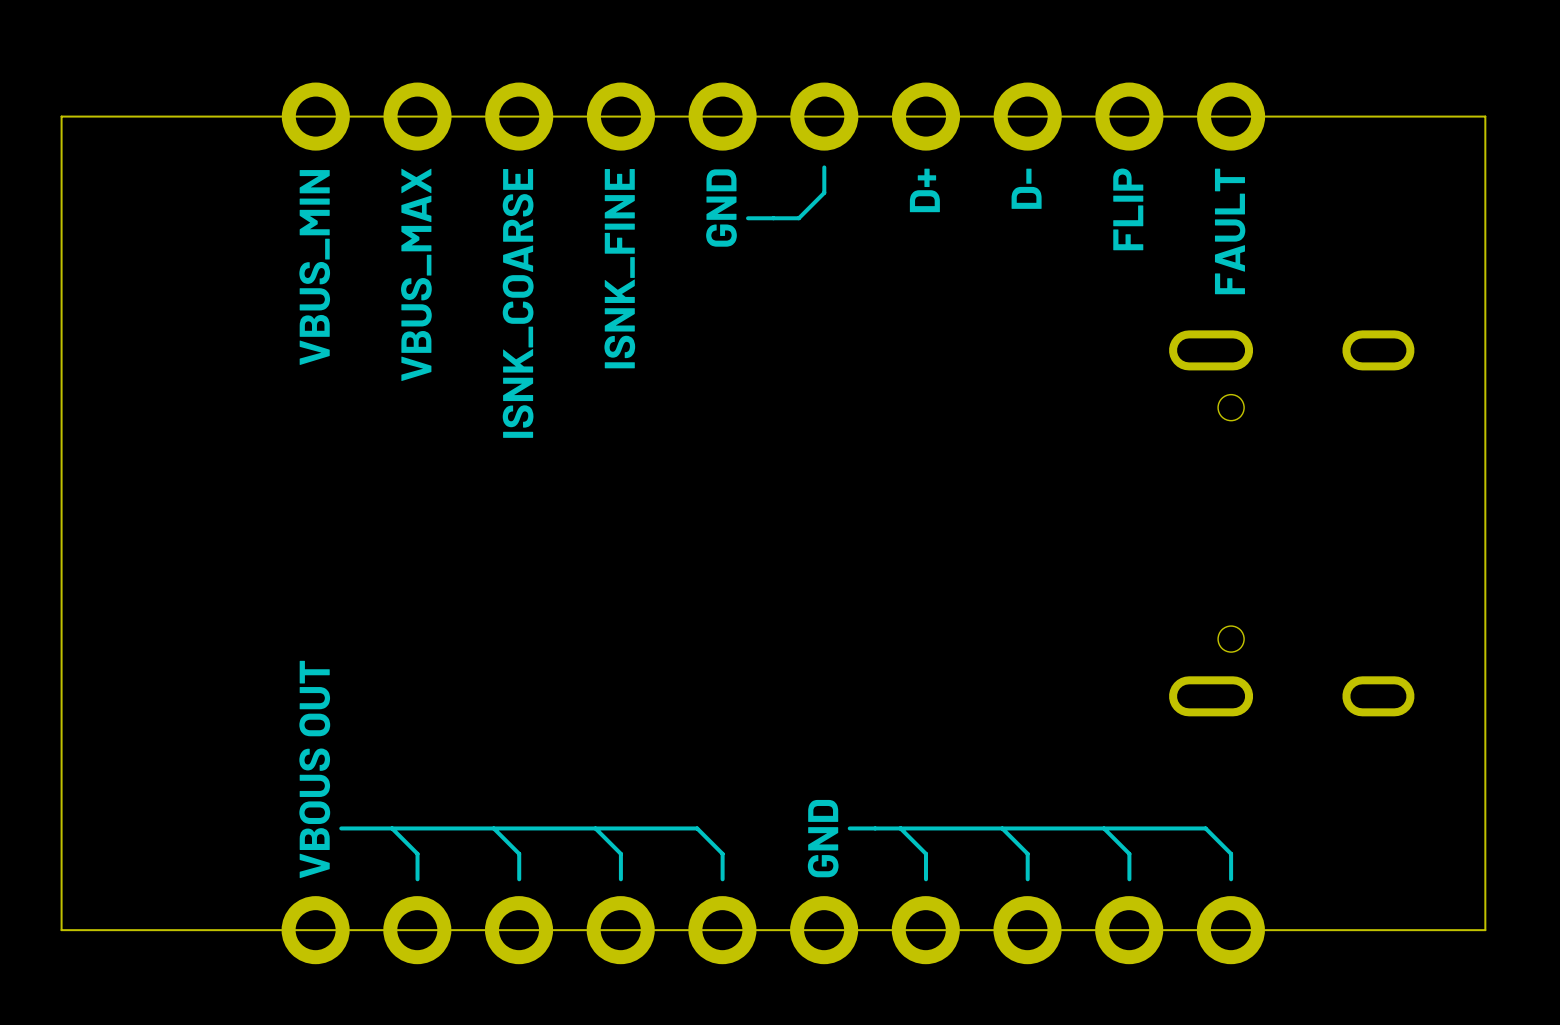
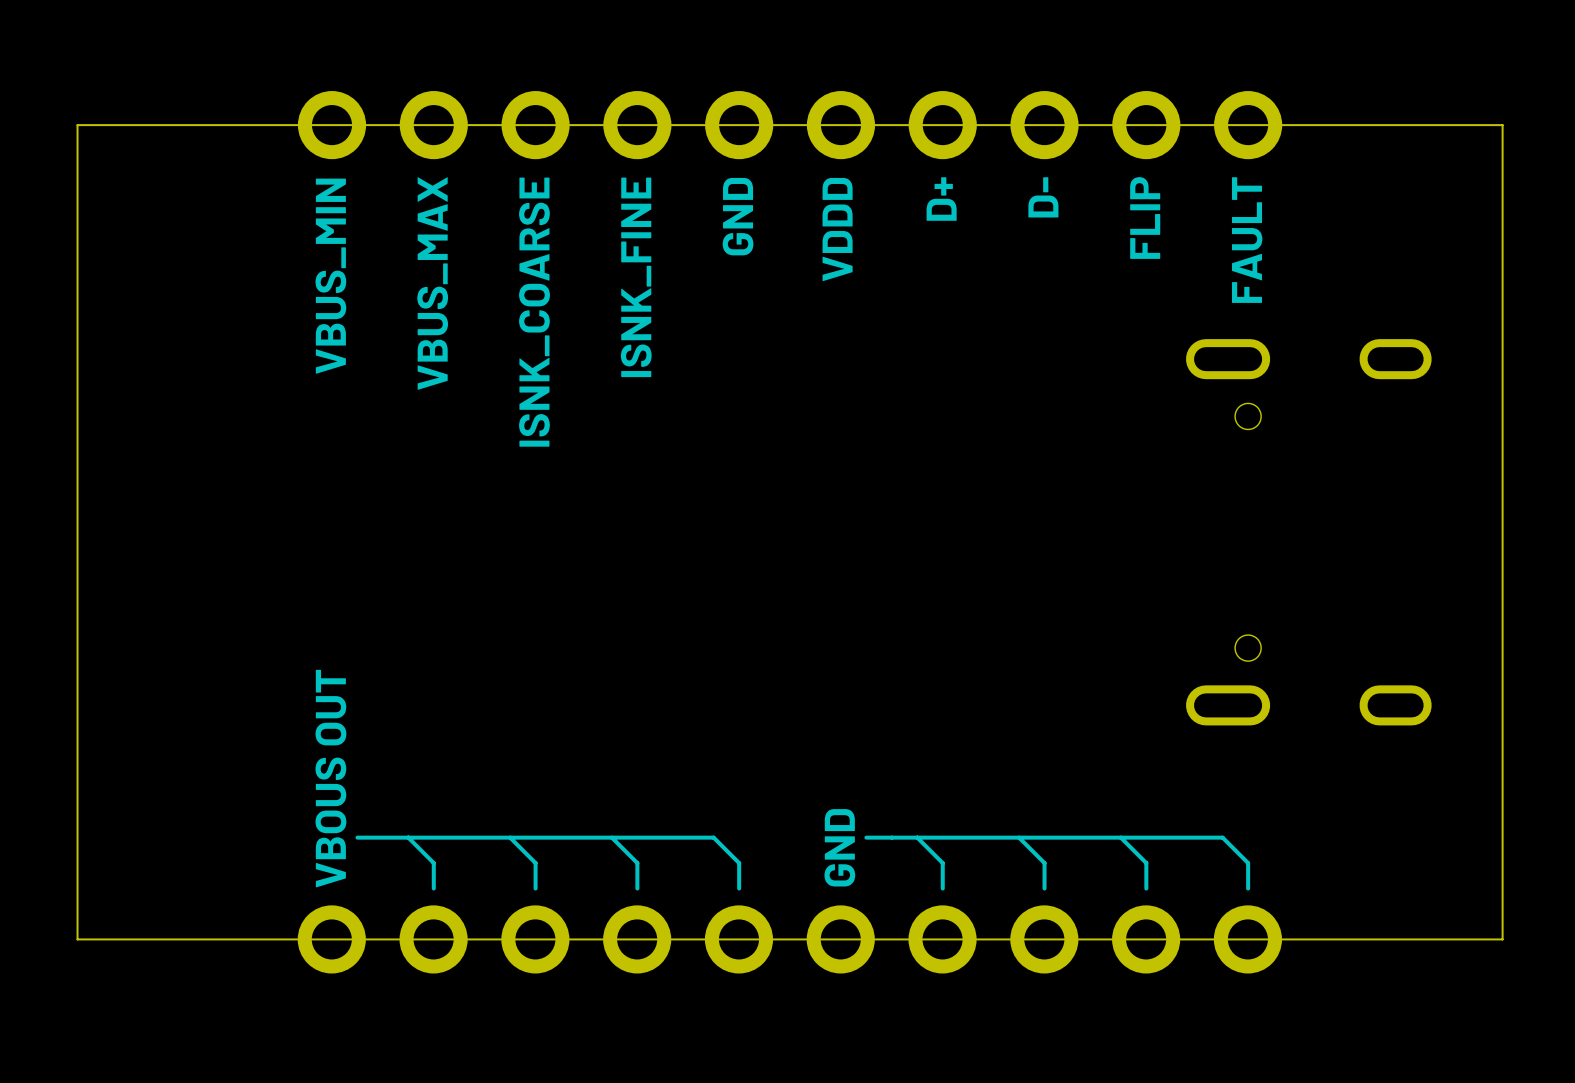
line: (824, 167) (824, 192) (798, 218) (748, 218) -> none
text: none -> VDDD (837, 229)

